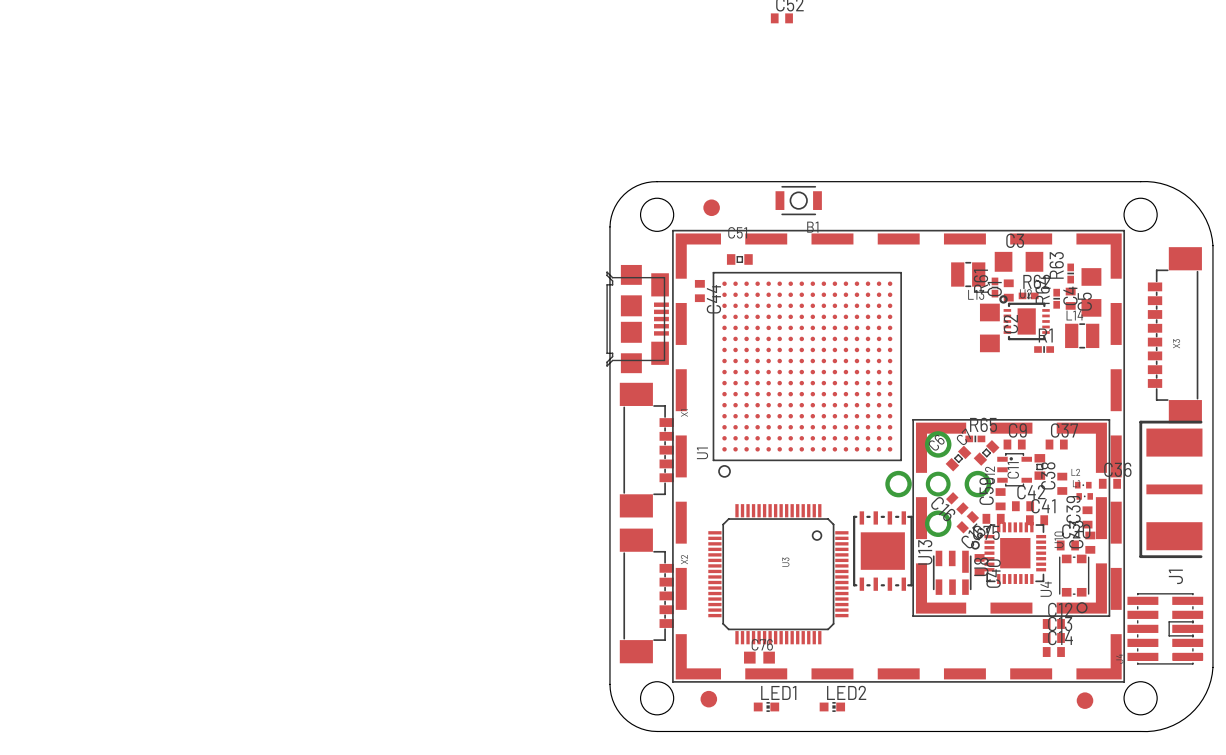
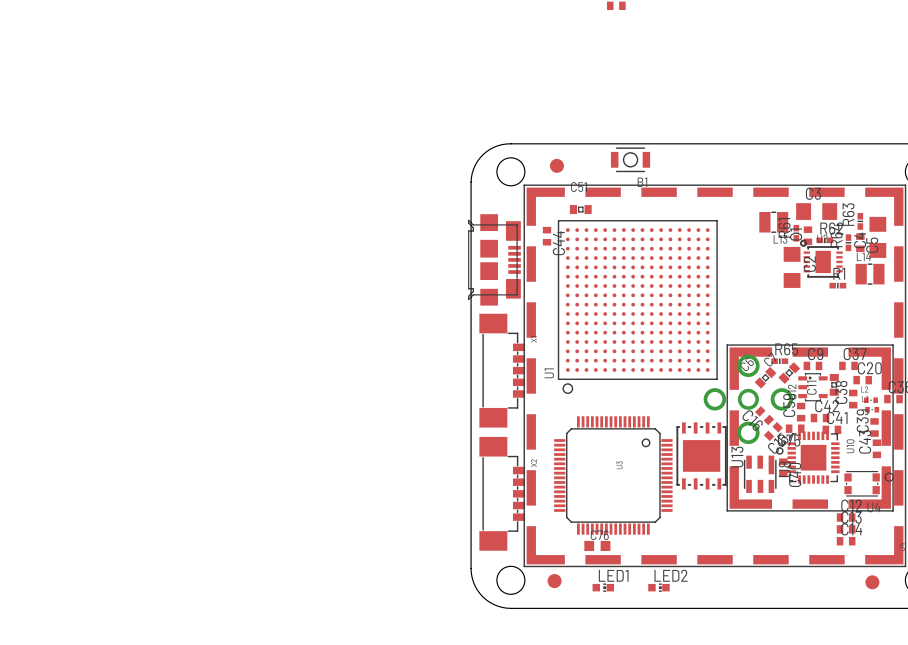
C20 position: (1067, 545) -> (862, 380)
U4 rotation: 0° (1074, 583) -> 90° counterclockwise (869, 483)

